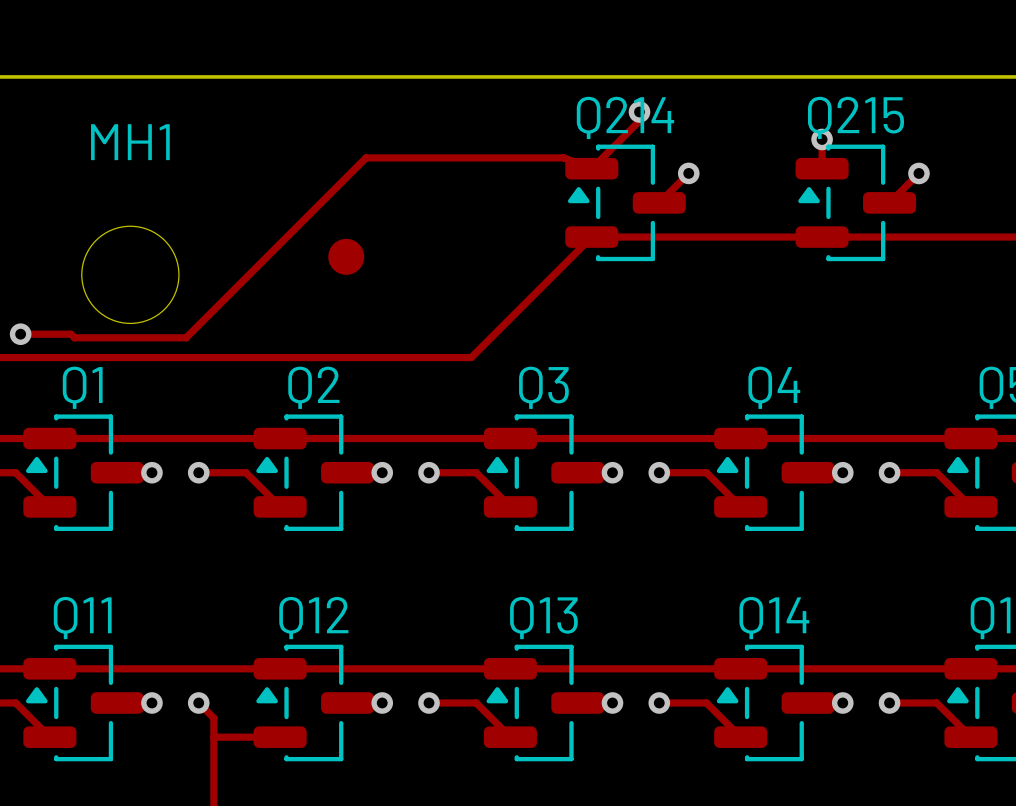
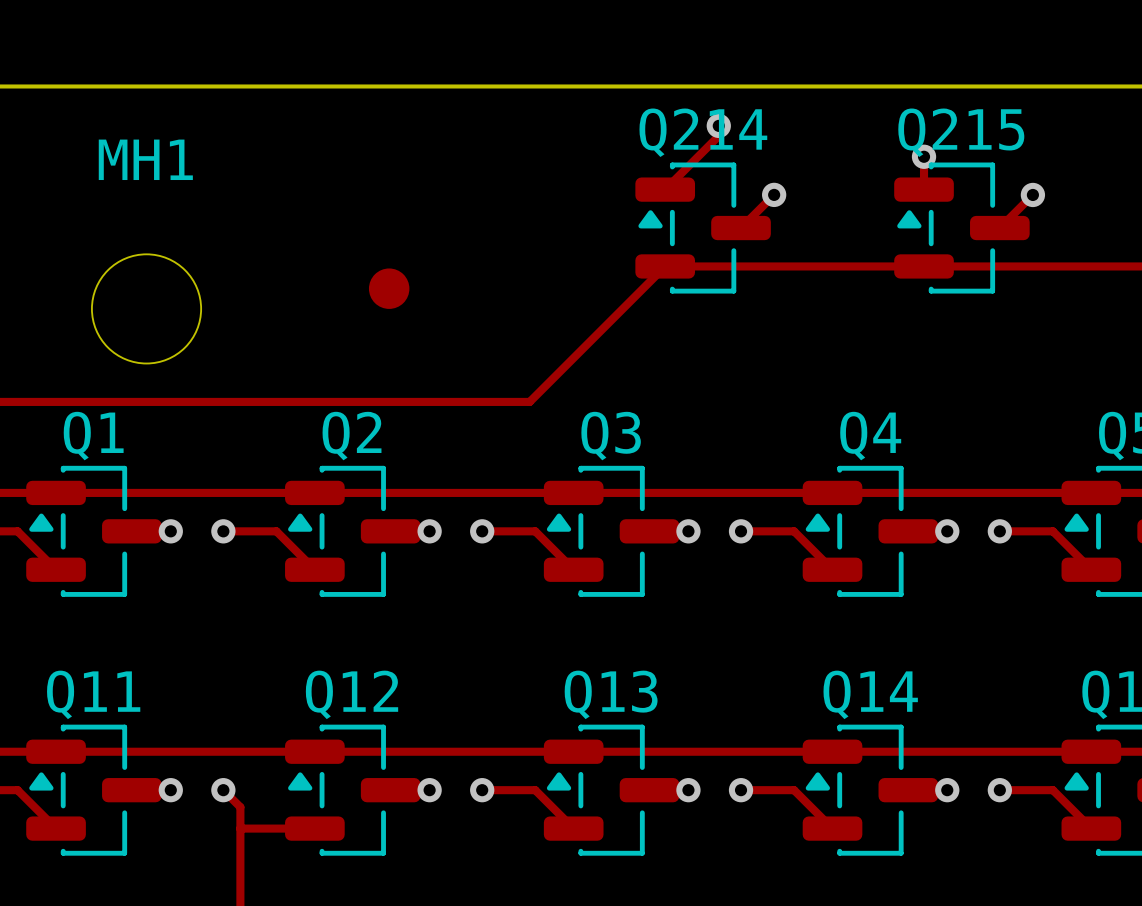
track: (591, 168) (563, 157) (366, 157) (186, 337) (74, 337) (71, 334) (20, 334) -> none
via: (20, 334) -> none

